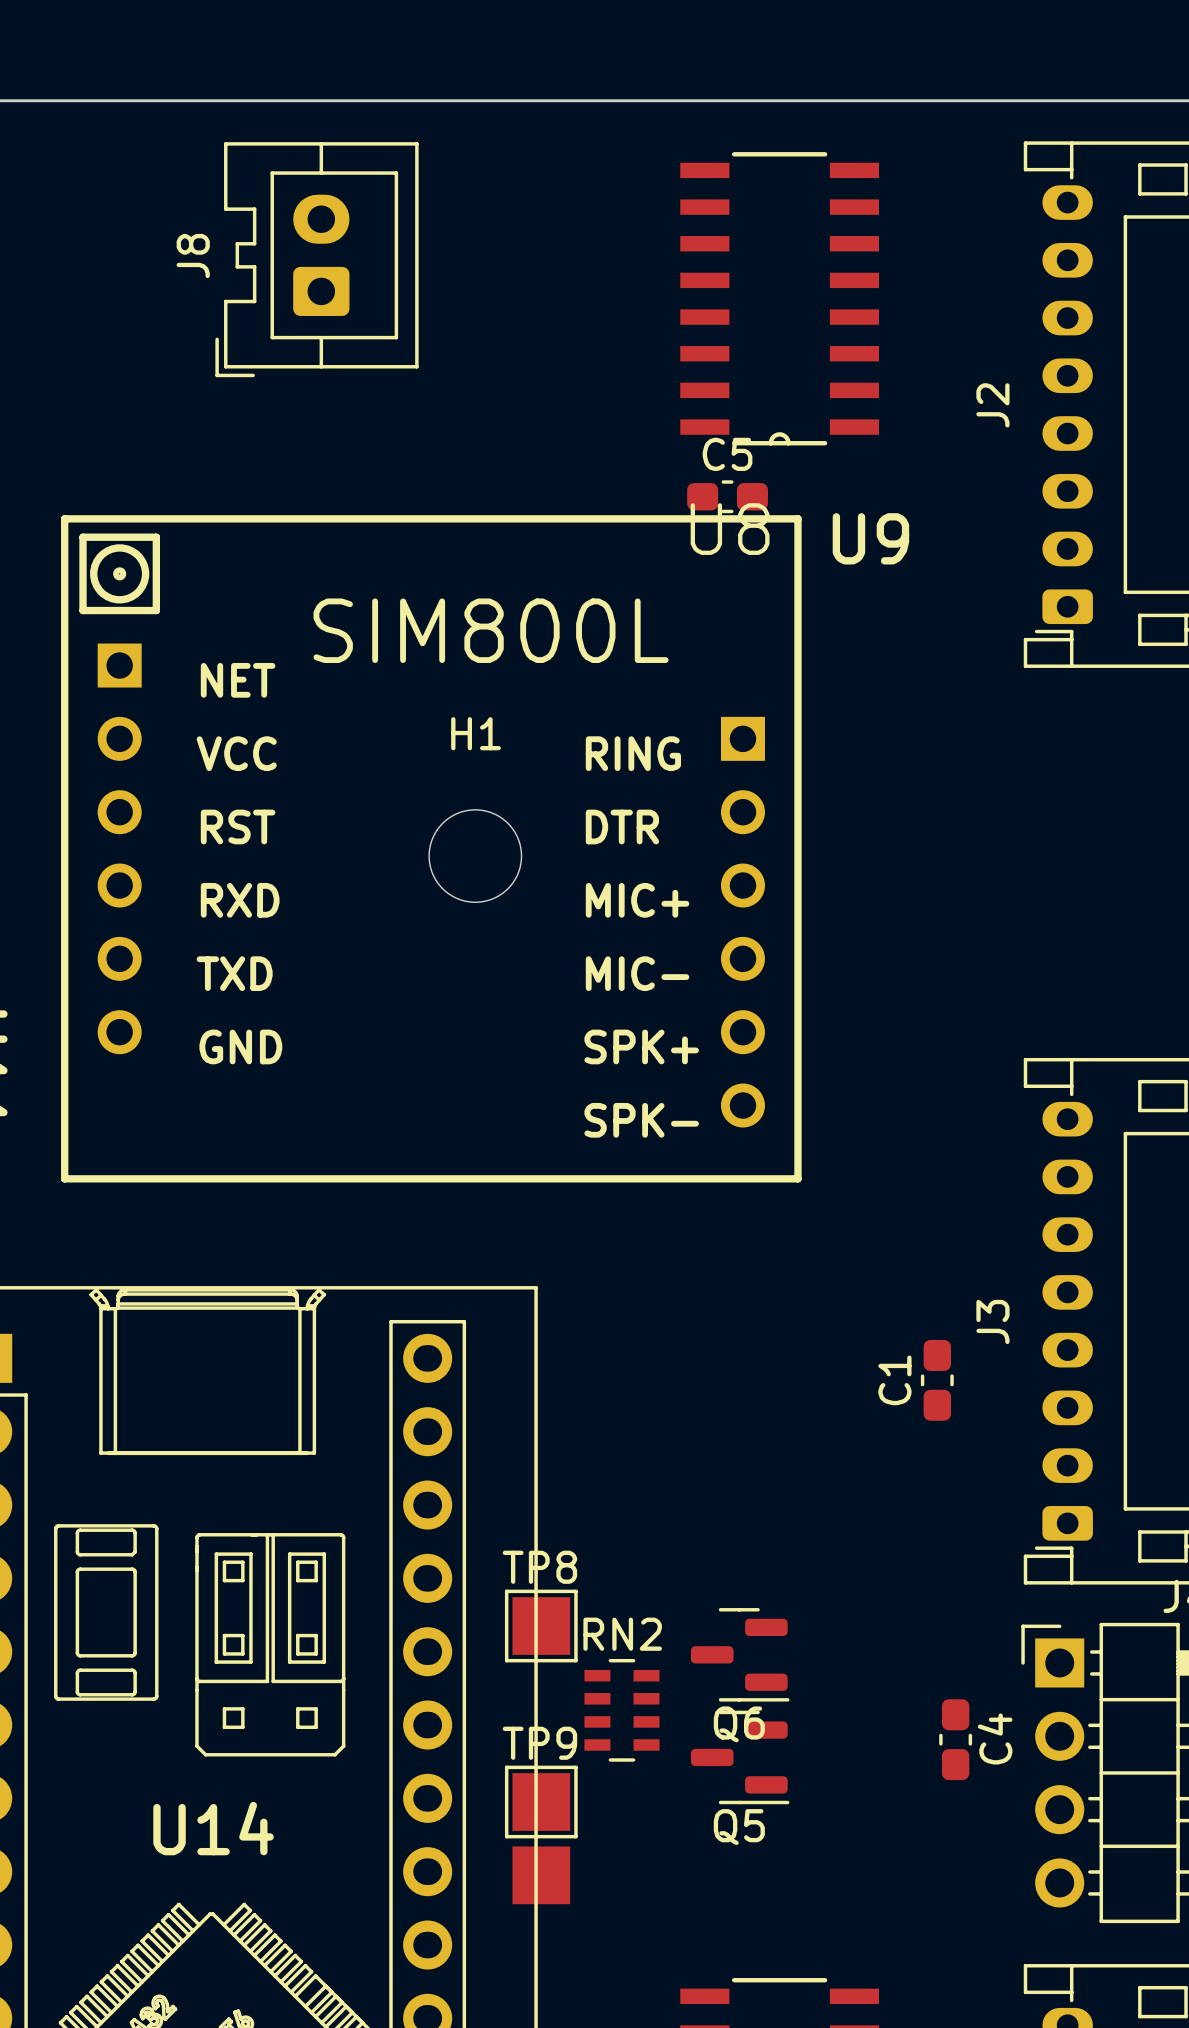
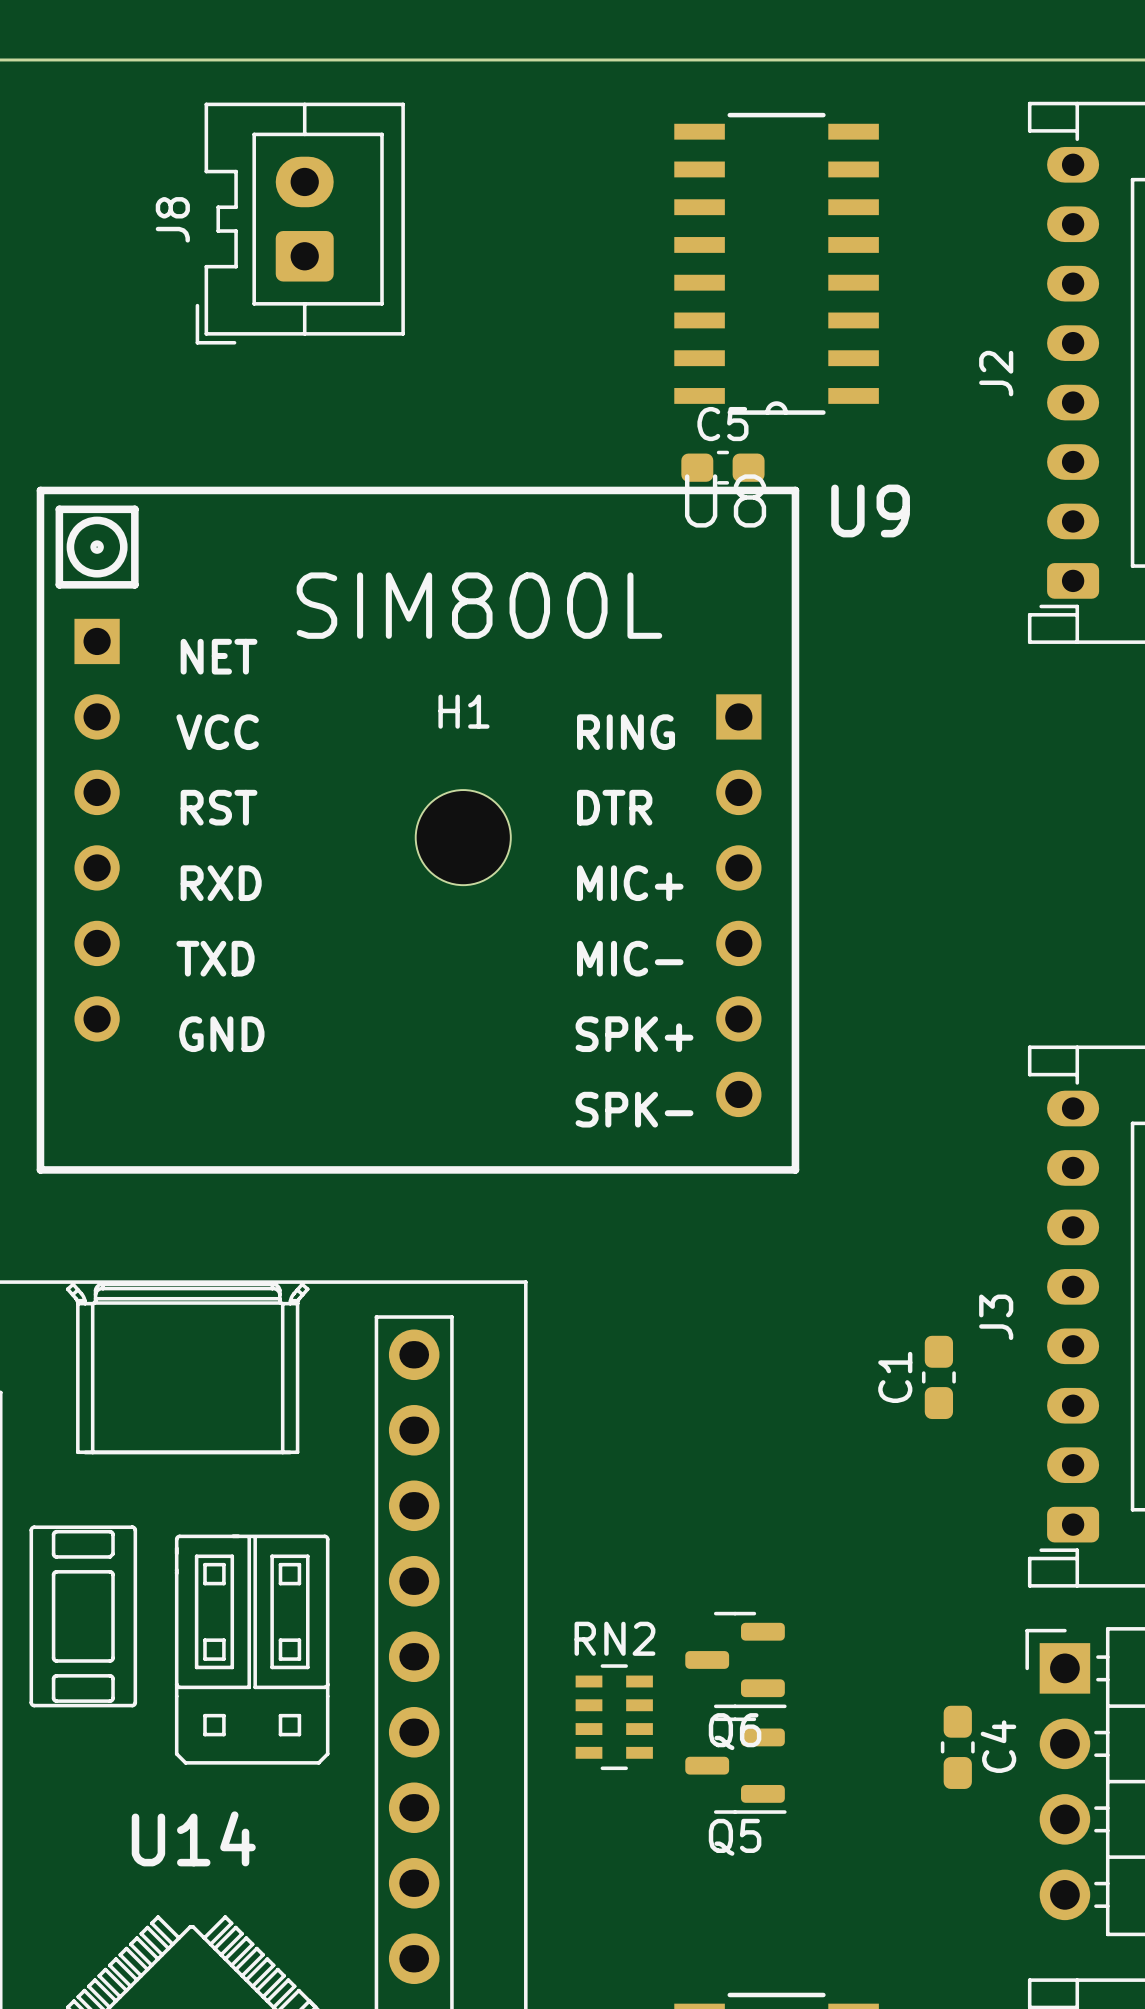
TP8: (541, 1626) -> none
TP9: (541, 1802) -> none
part: (541, 1875) -> none

